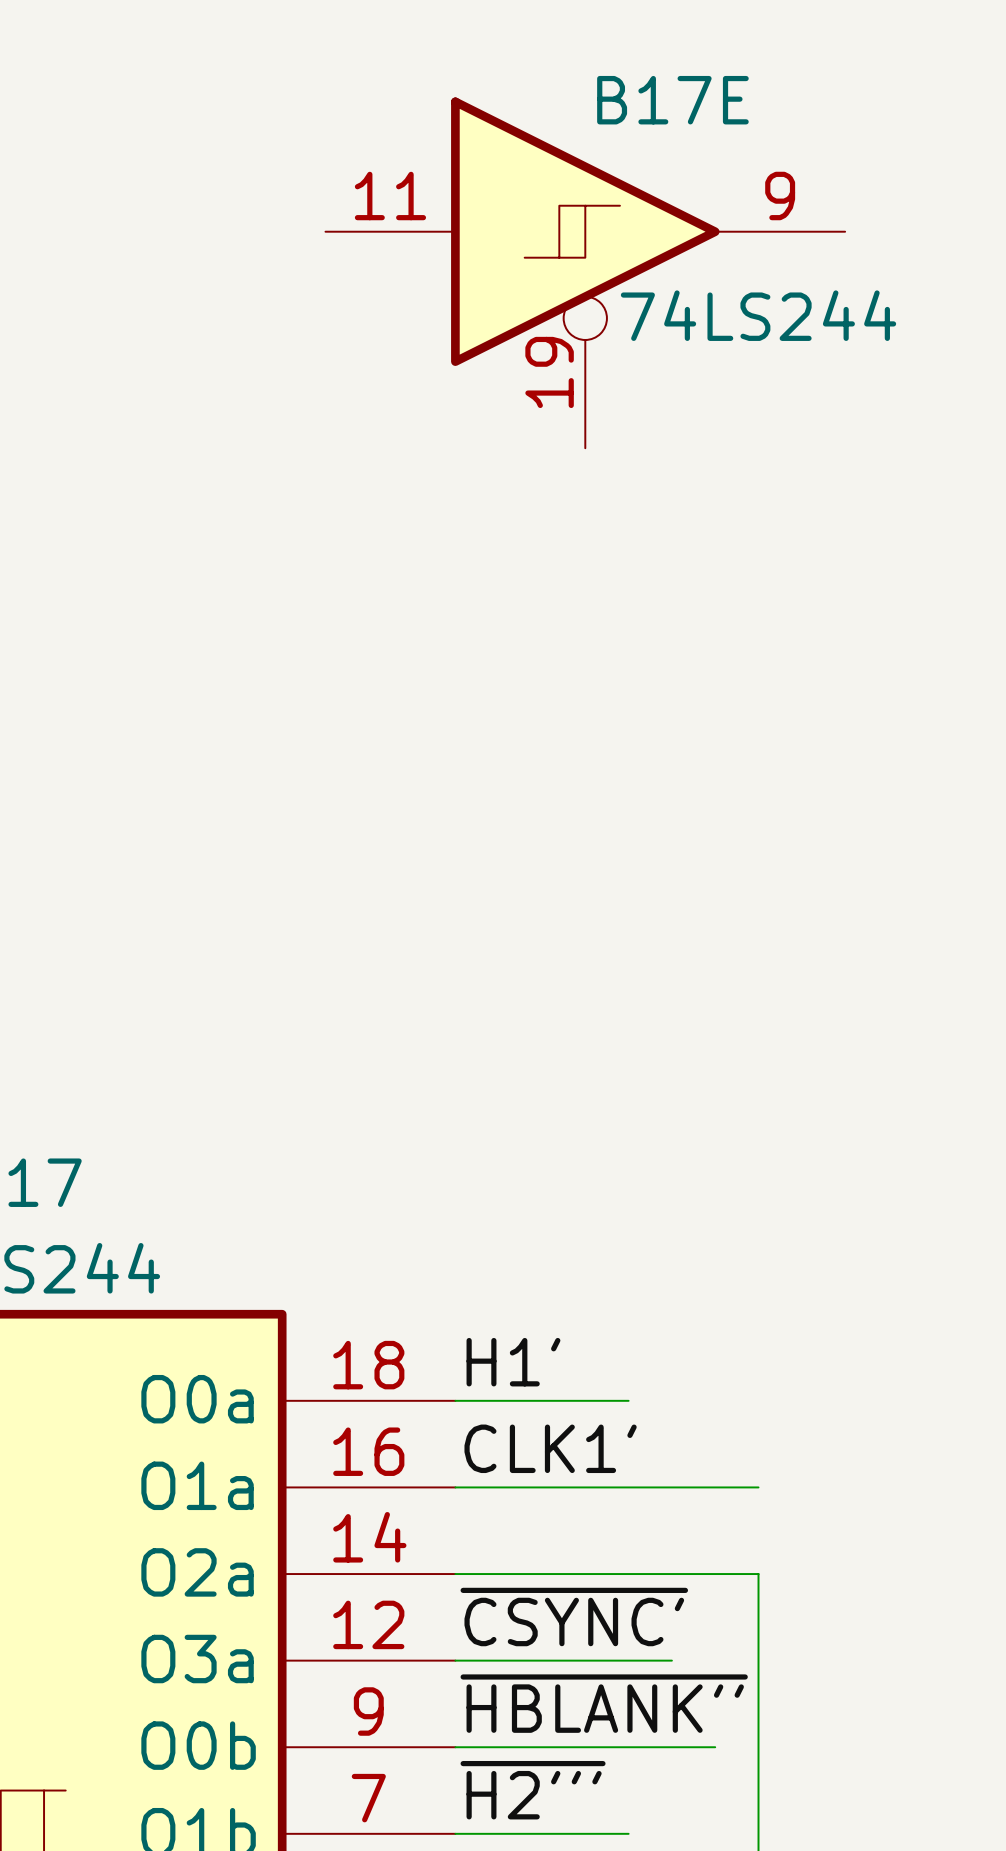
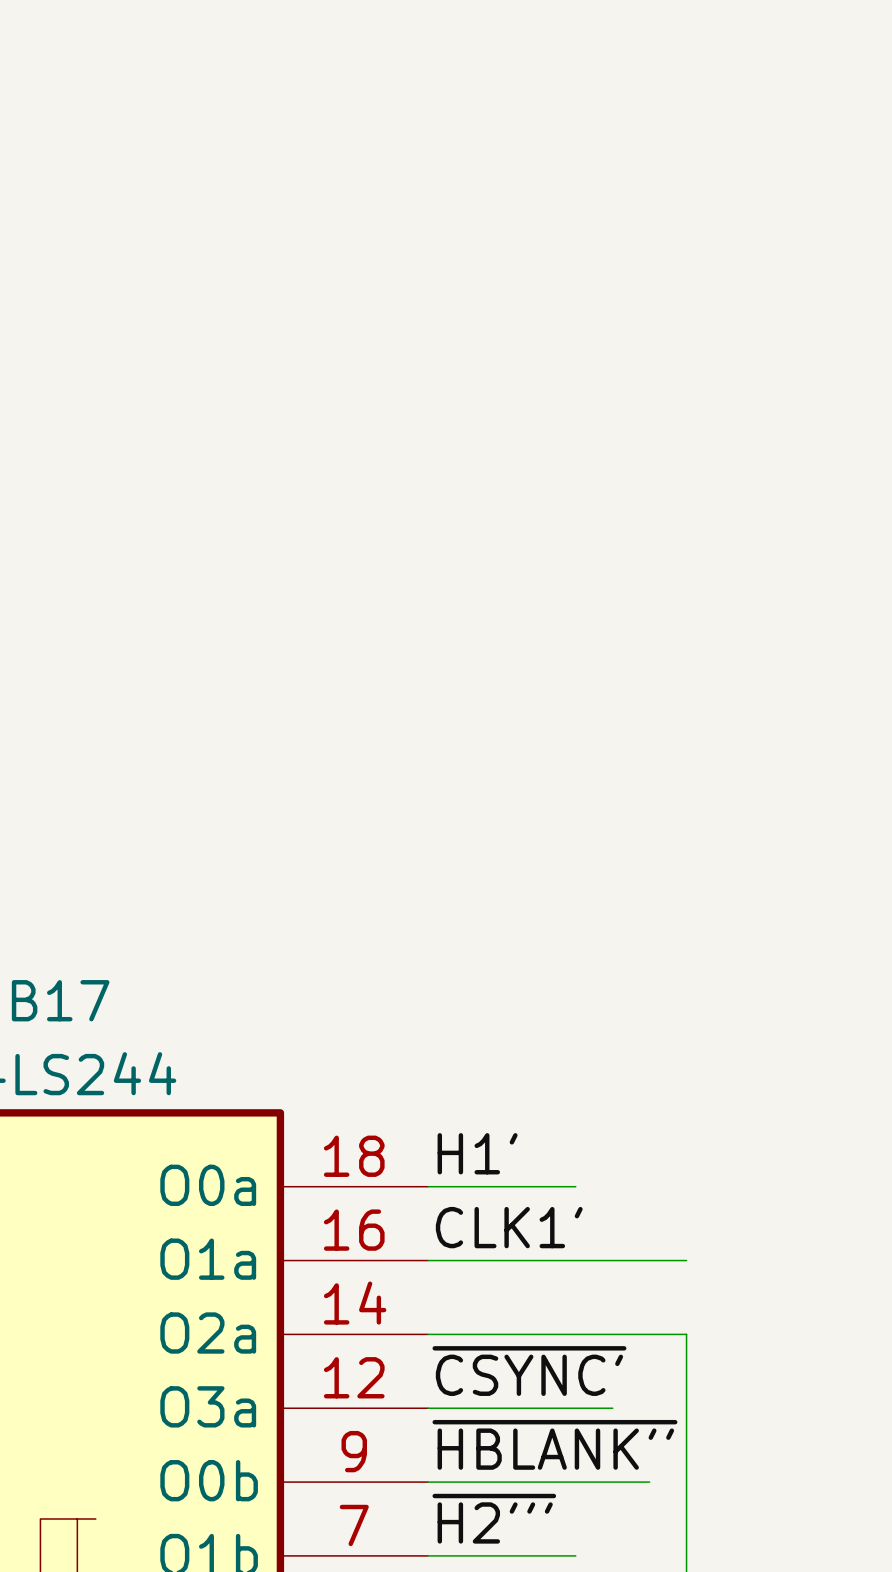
B17E: 74LS244 (585, 272) -> none

